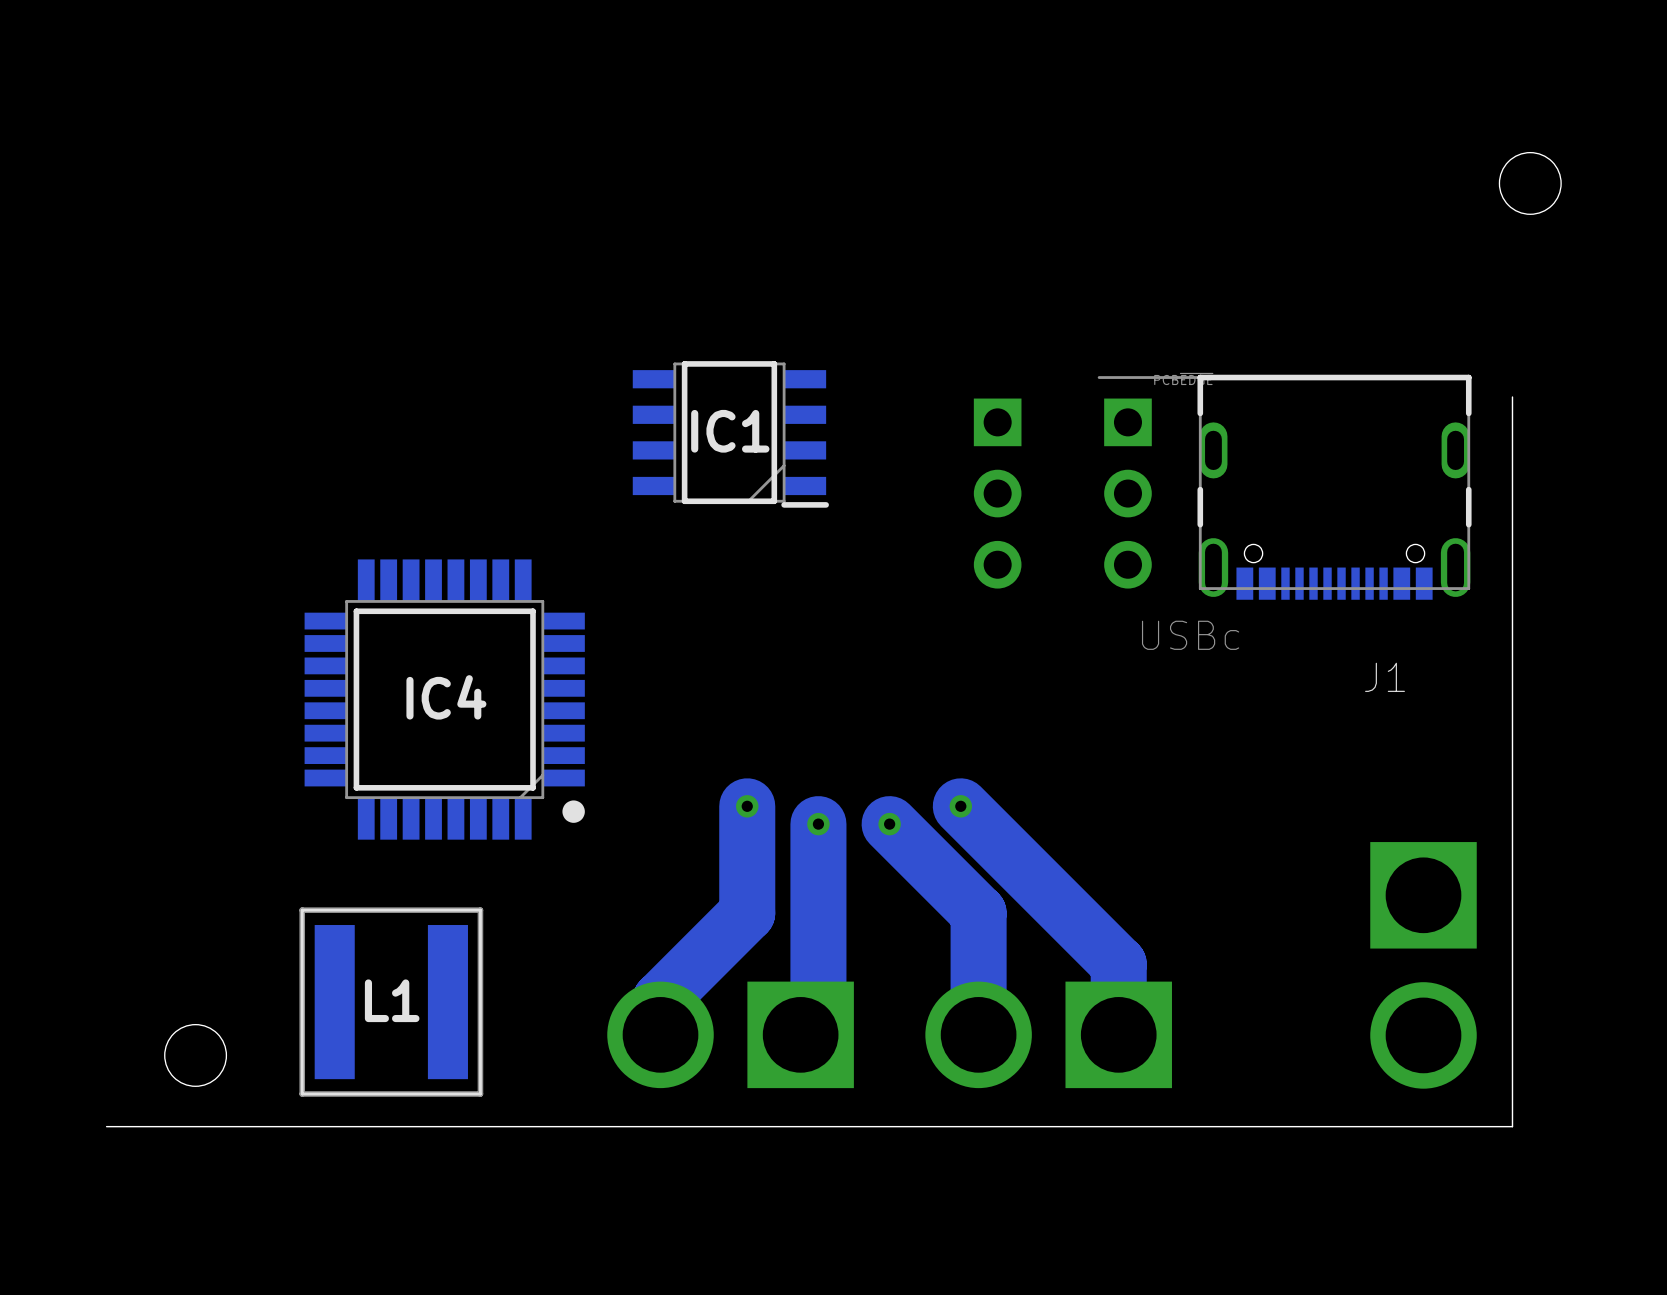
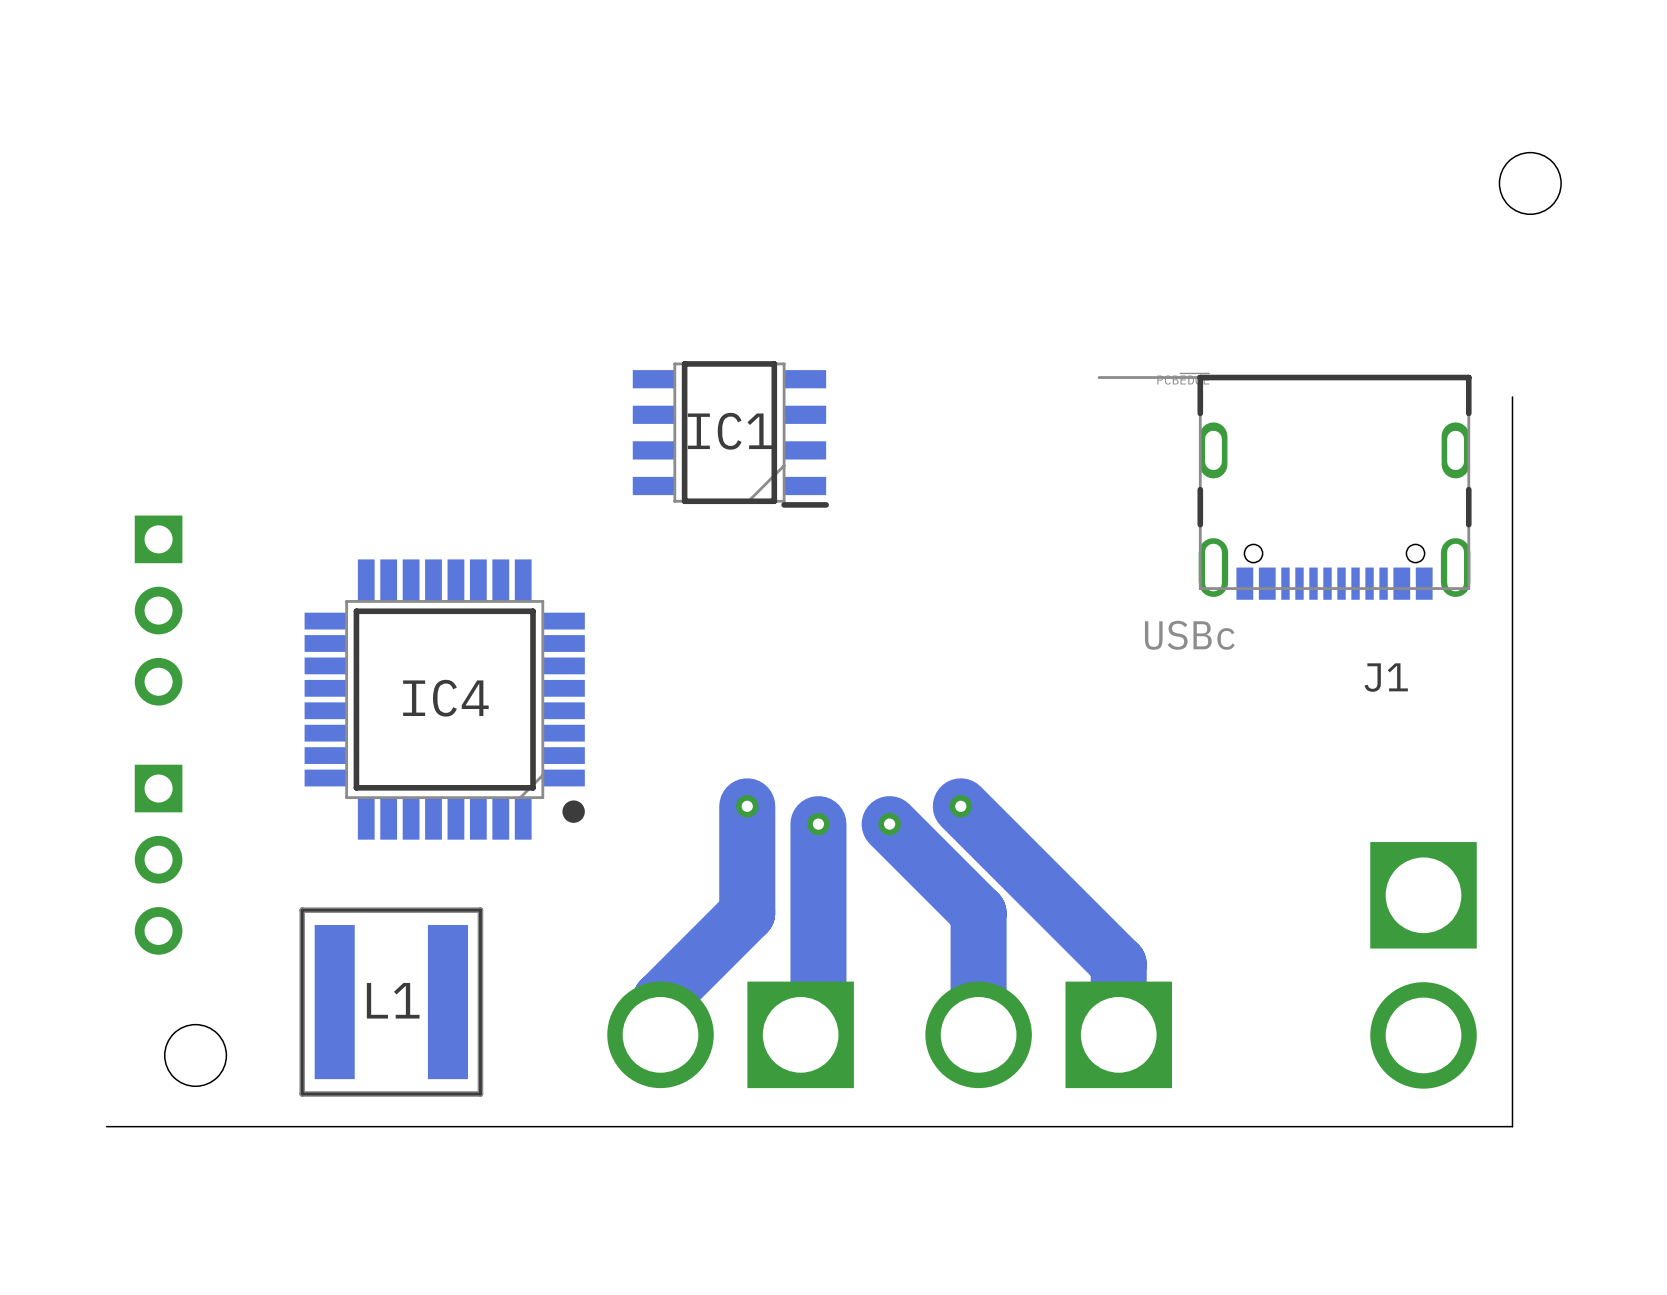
part: (997, 493) -> none
part: (1127, 493) -> none
part: none -> (158, 610)
part: none -> (158, 859)

